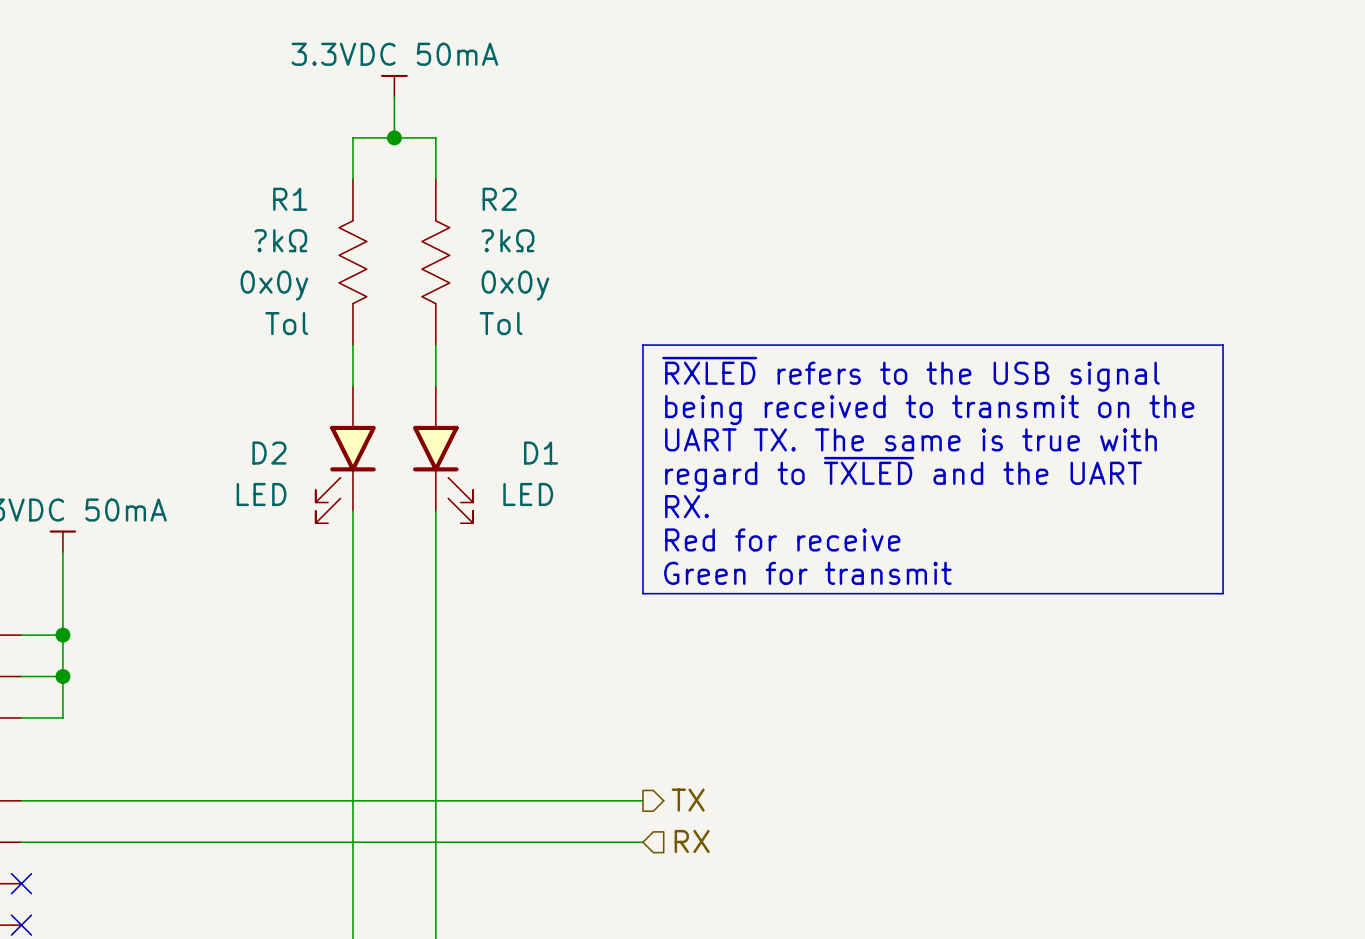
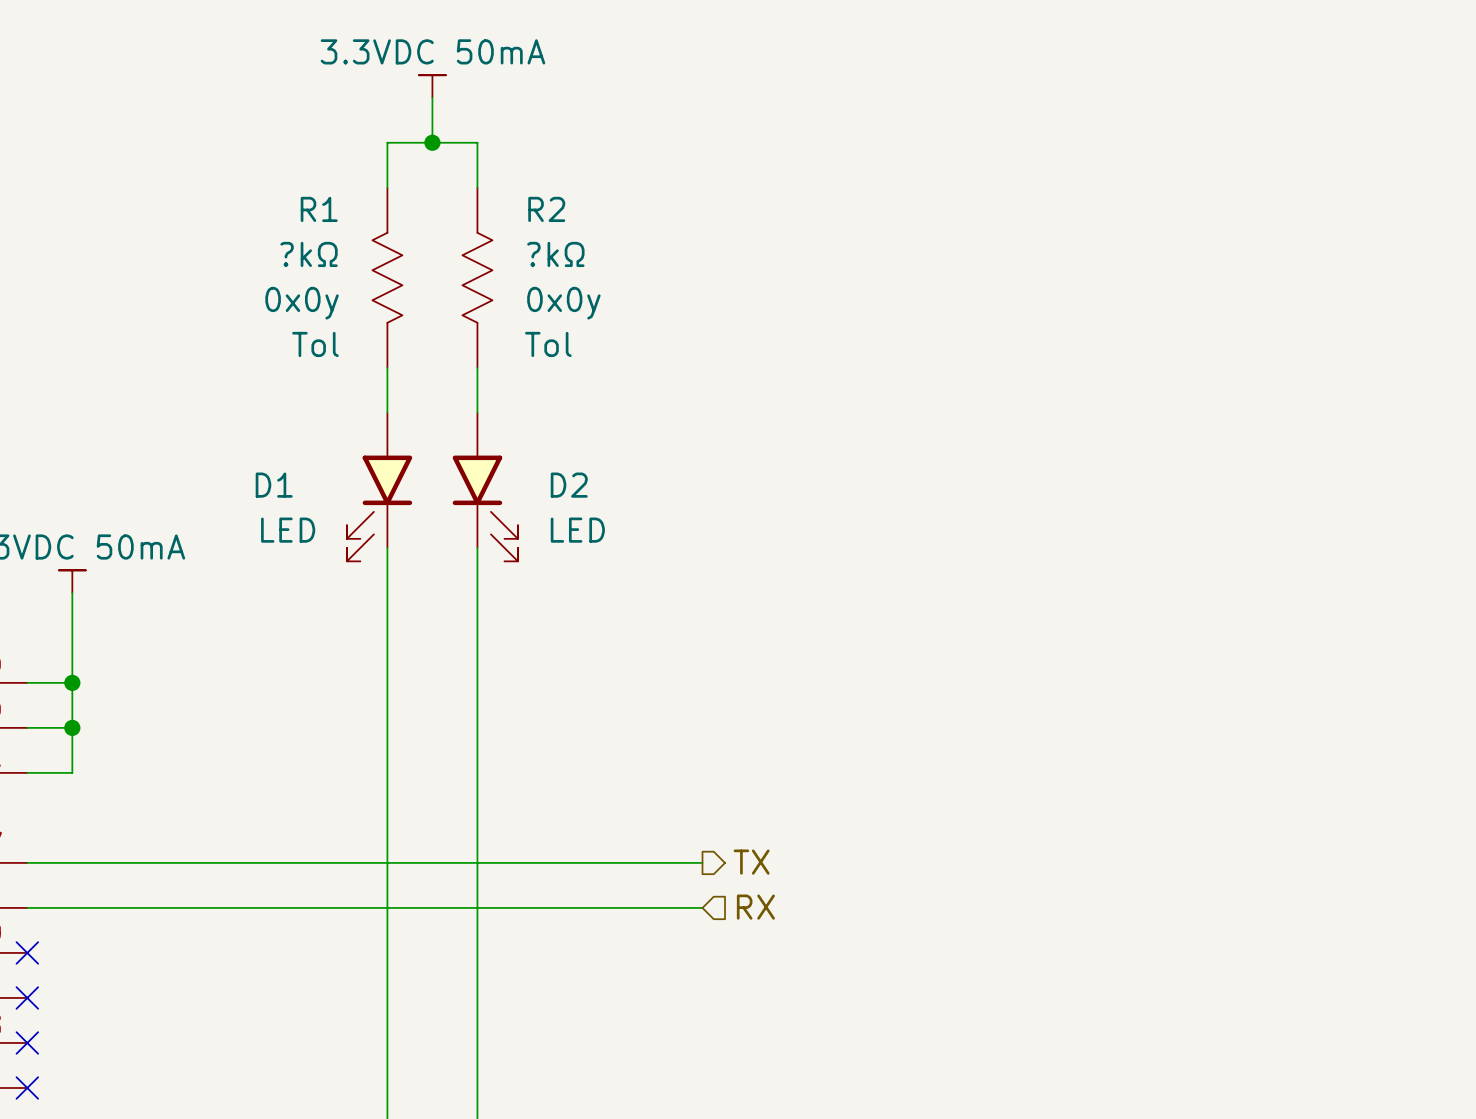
line: (642, 345) (1223, 345) (1223, 593) (642, 593) (642, 345) -> none
text: ~{RXLED} refers to the USB signal (911, 374) -> none
text: being received to transmit on the (929, 410) -> none
text: UART TX. The same is true with (910, 439) -> none
D2 name: D2 (269, 453) -> D1 (274, 485)
D1 name: D1 (541, 453) -> D2 (569, 485)
text: regard to ~{TXLED} and the UART (903, 474) -> none
text: RX. (687, 506) -> none
text: Red for receive (782, 539) -> none
text: Green for transmit (807, 573) -> none

